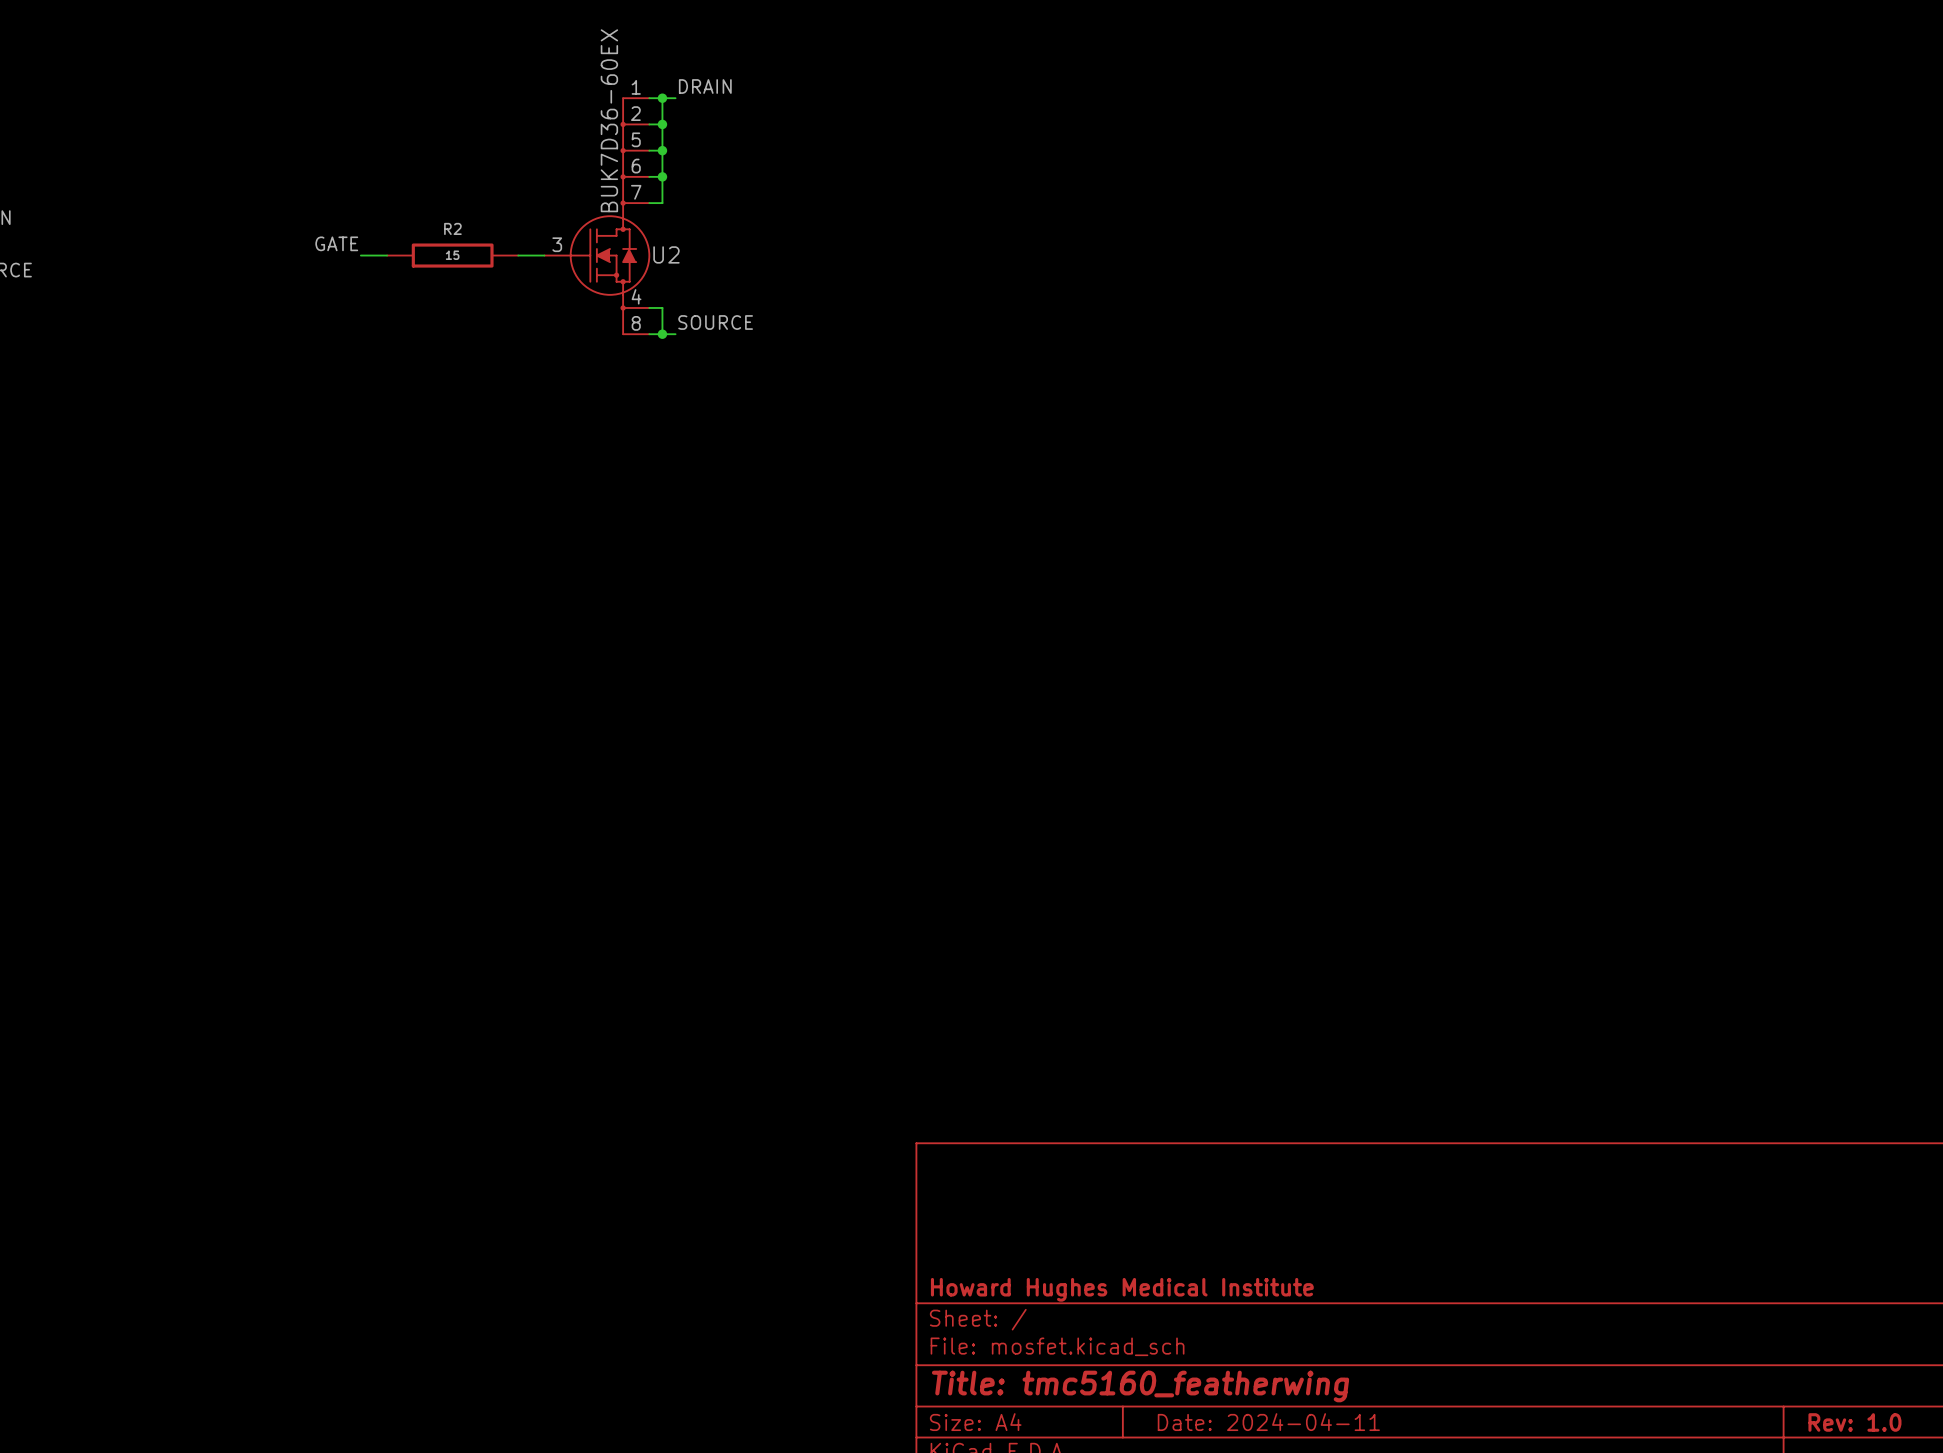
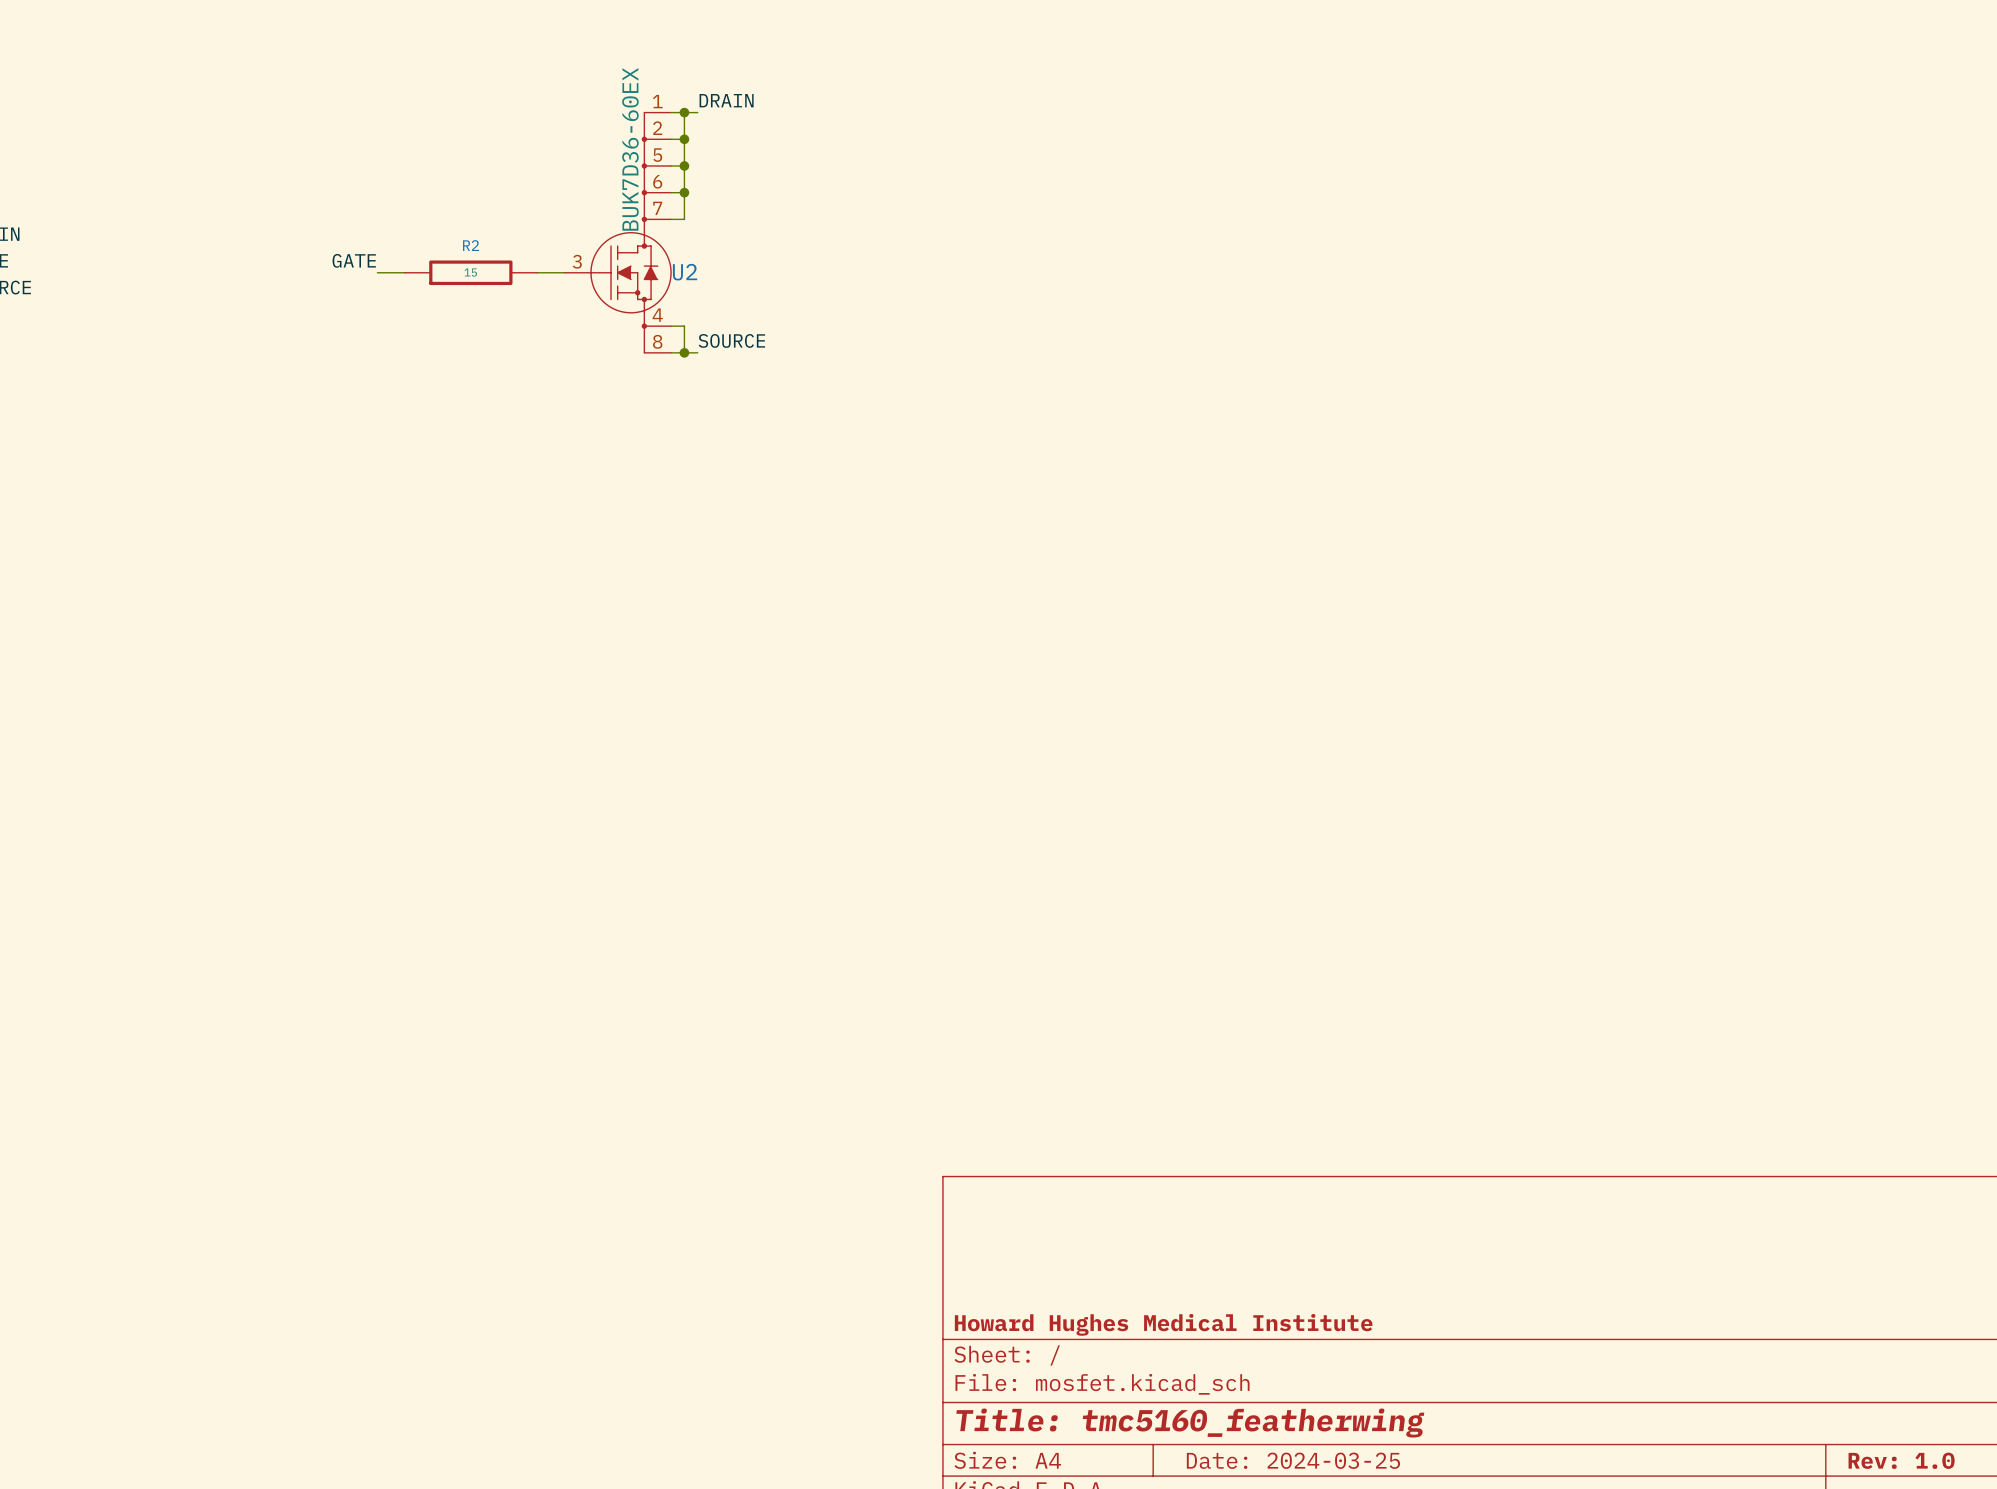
title block: Date: 2024-04-11 (1268, 1422) -> Date: 2024-03-25 (1293, 1460)

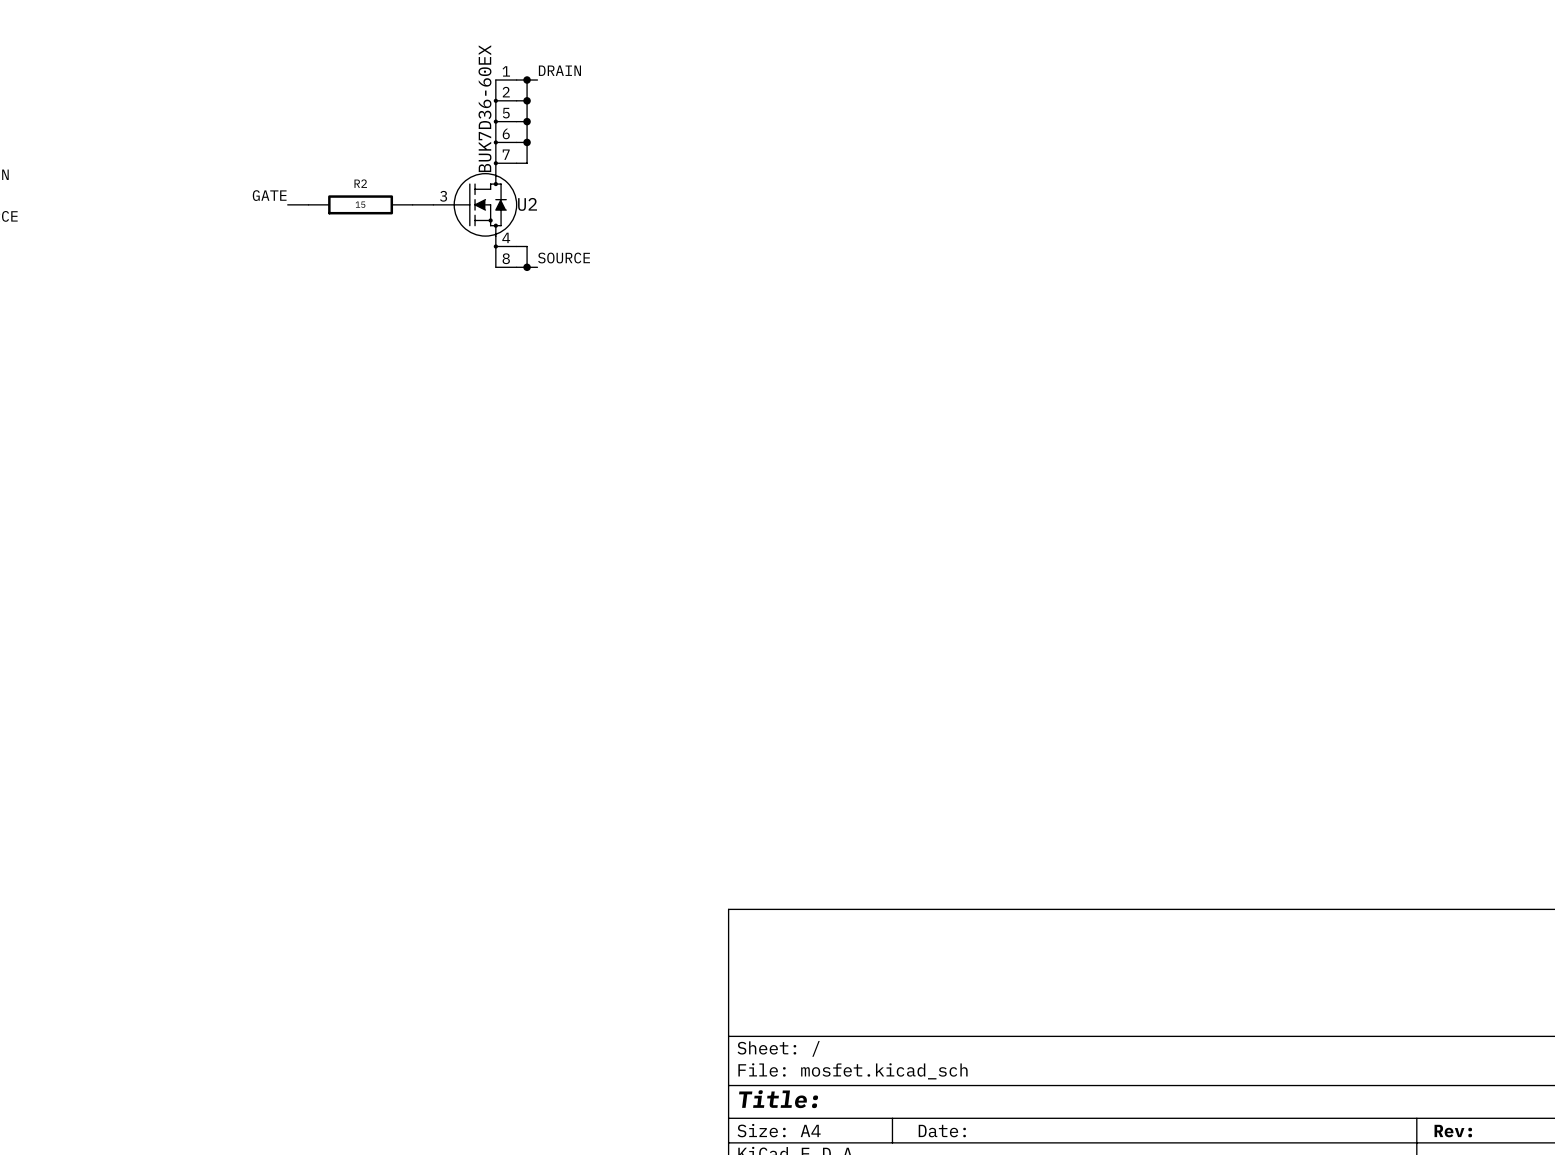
title block: Howard Hughes Medical Institute (1163, 1324) -> none
title block: Title: tmc5160_featherwing (1190, 1423) -> Title: (778, 1099)
title block: Date: 2024-03-25 (1293, 1460) -> Date: (942, 1131)
title block: Rev: 1.0 (1901, 1460) -> Rev: (1453, 1131)

